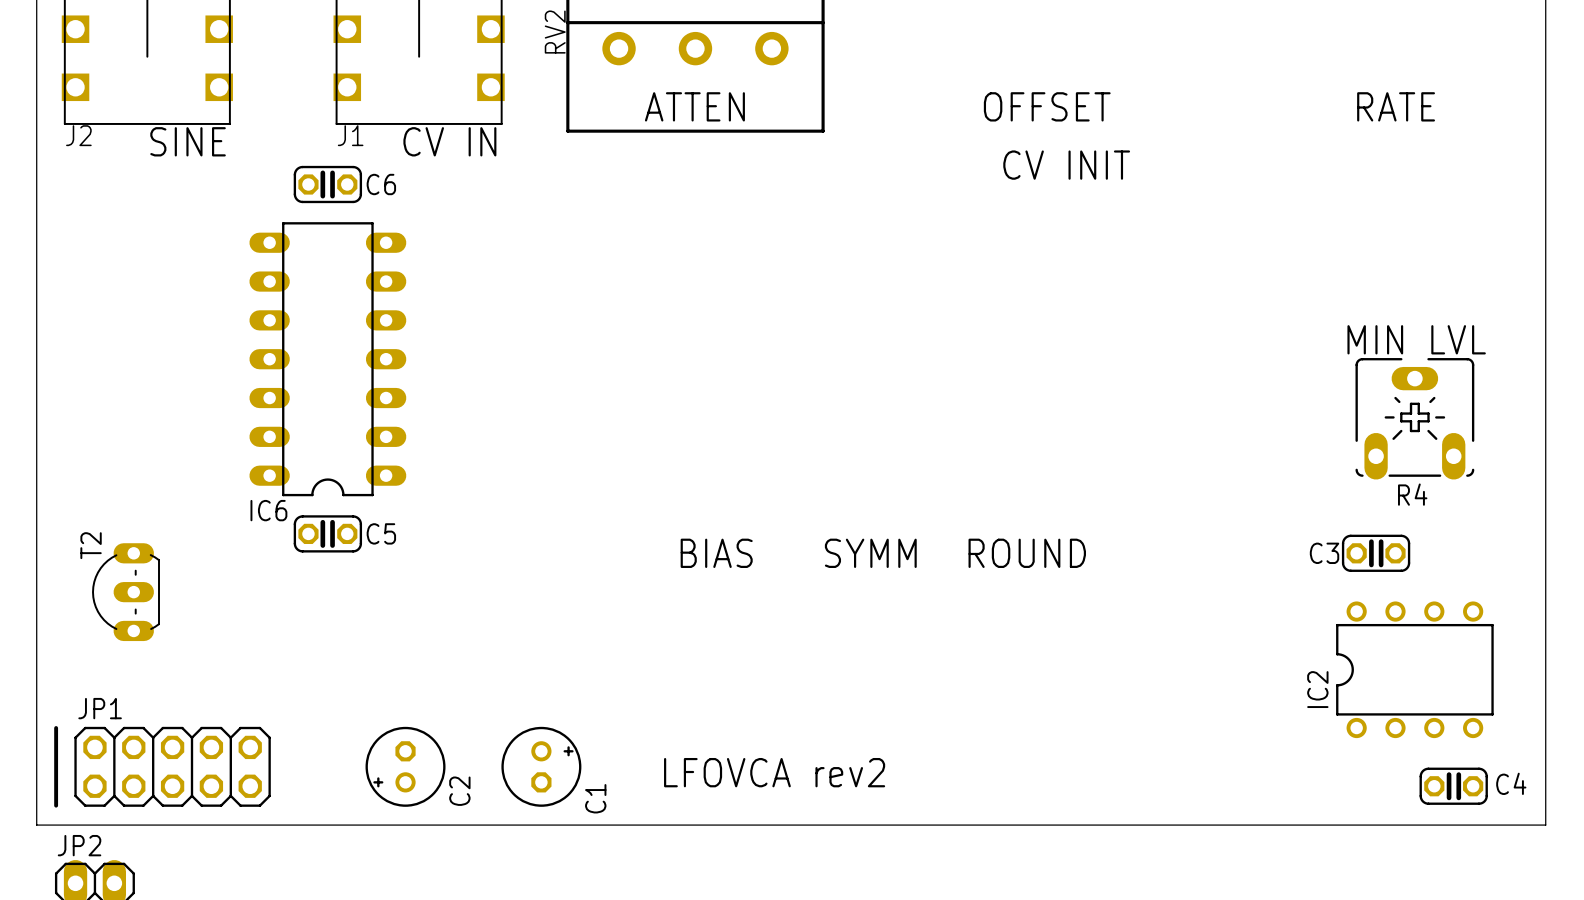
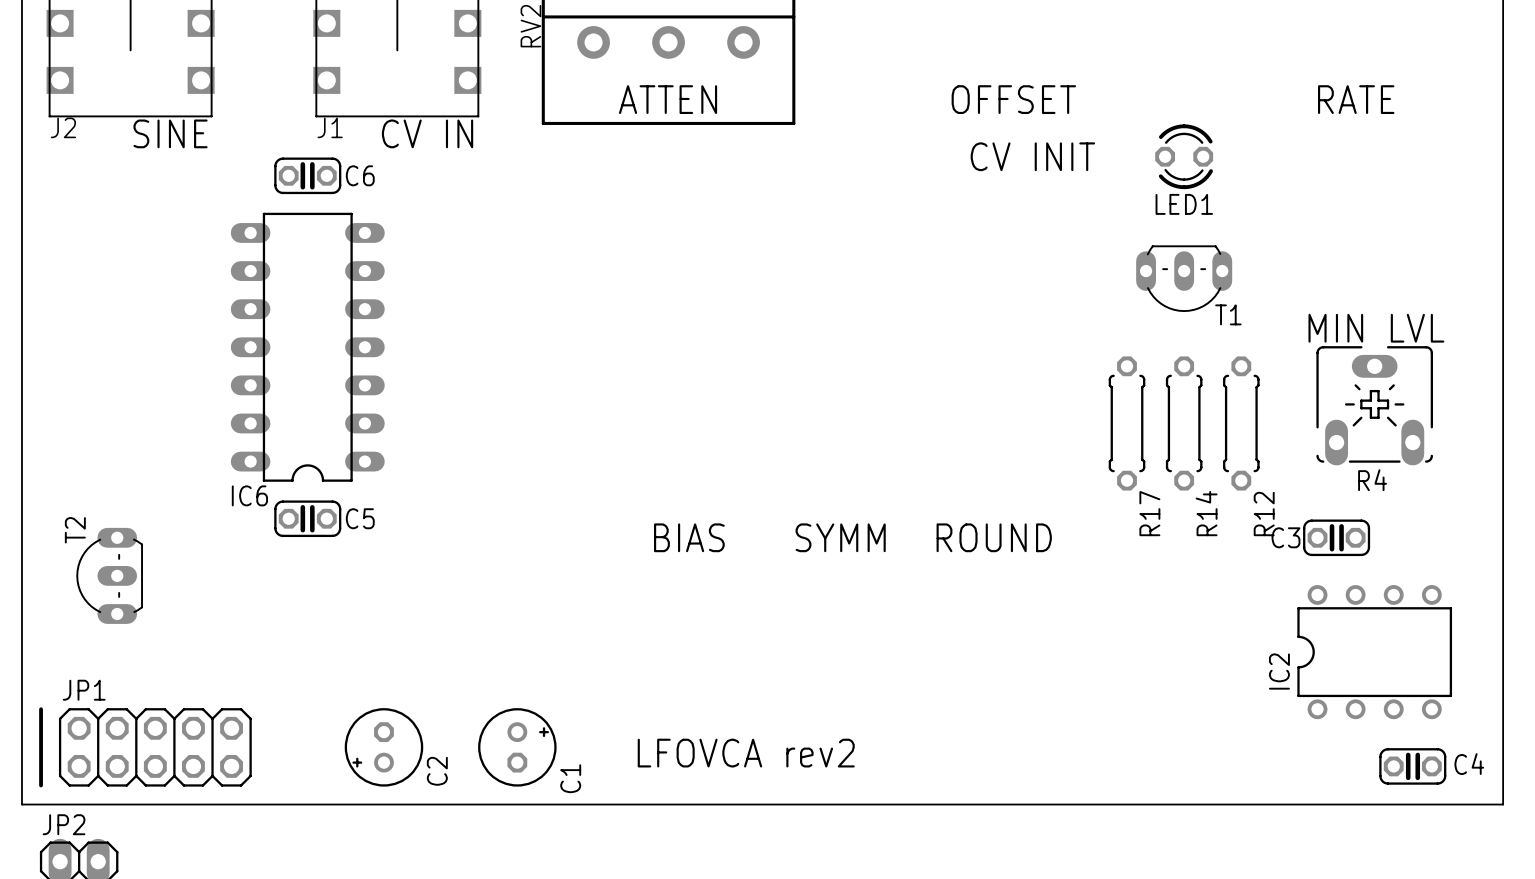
LED1: none -> (1184, 156)
T1: none -> (1184, 278)
R17: none -> (1127, 423)
R14: none -> (1184, 423)
R12: none -> (1241, 423)

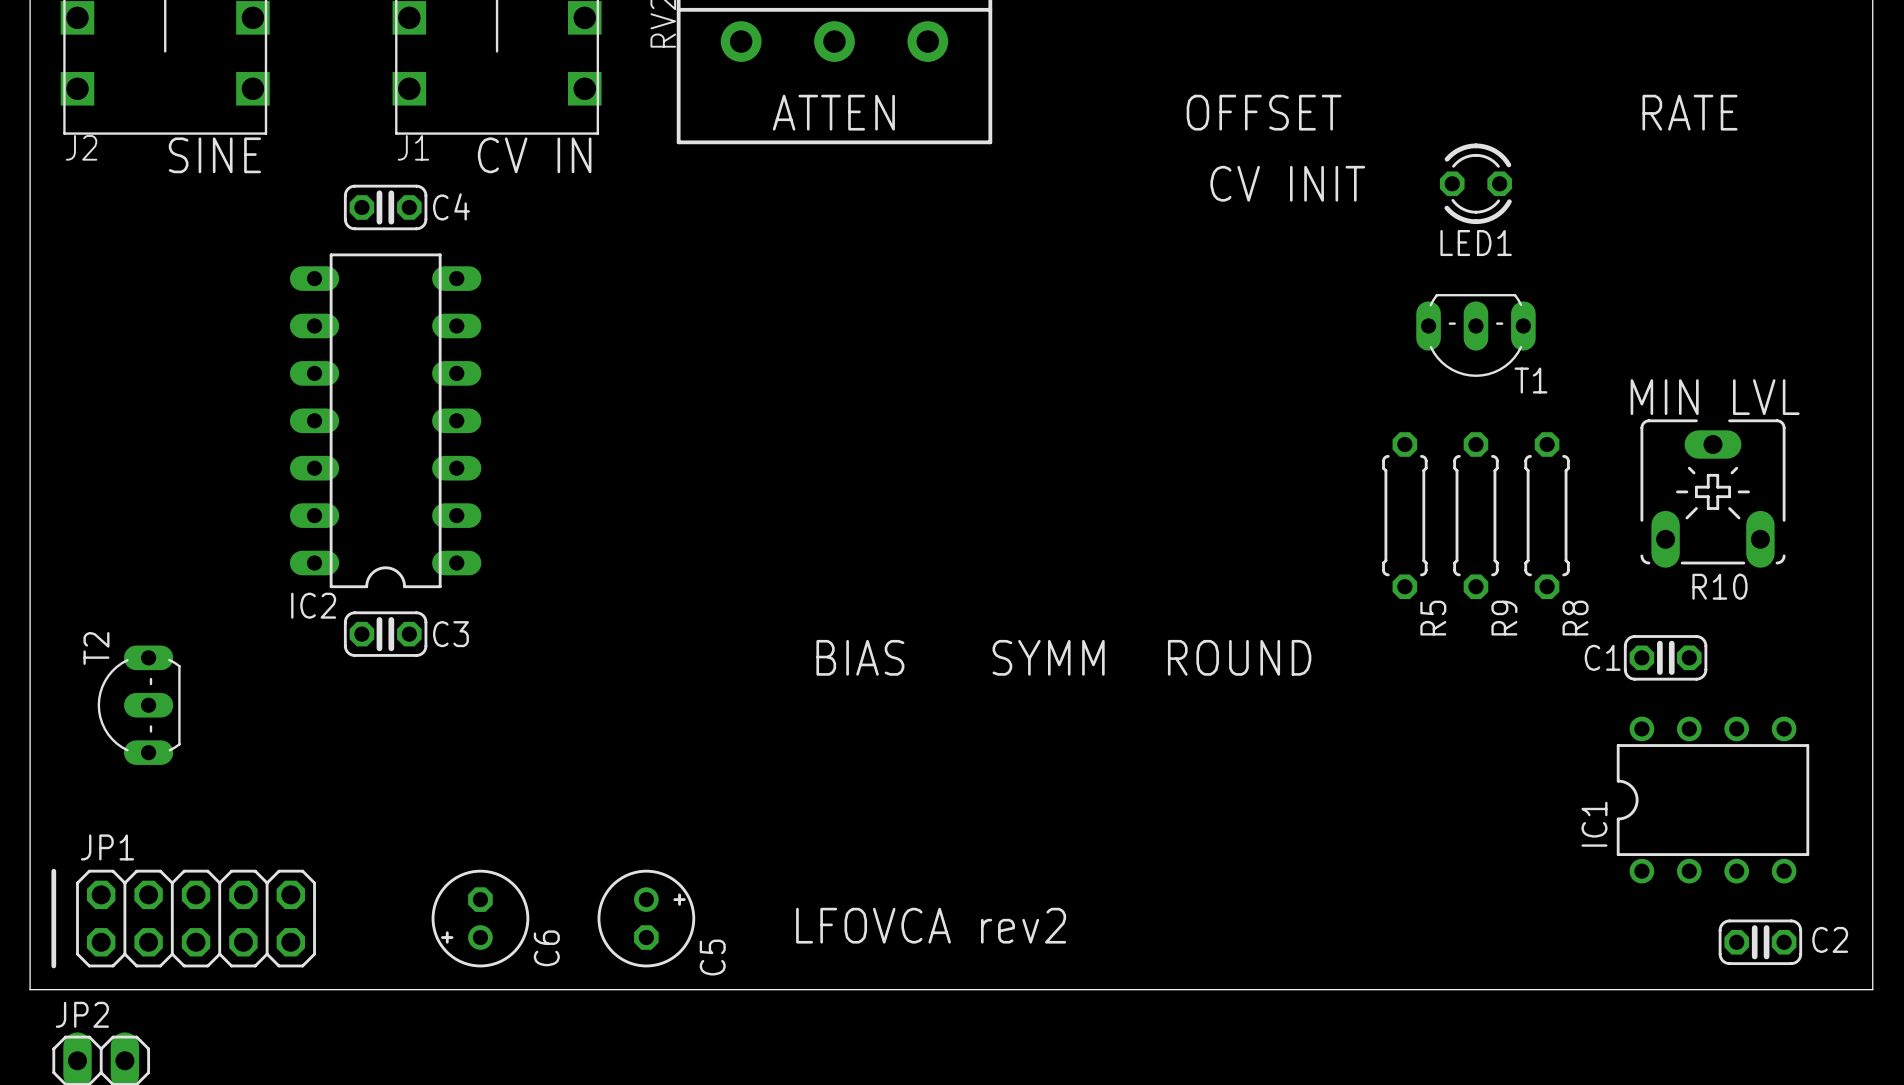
C6 name: C6 (360, 175) -> C4 (451, 206)
R4 name: R4 (1372, 480) -> R10 (1719, 586)
IC6 name: IC6 (249, 495) -> IC2 (313, 605)
R17 name: R17 (1149, 513) -> R5 (1433, 618)
R14 name: R14 (1206, 513) -> R9 (1504, 618)
R12 name: R12 (1264, 514) -> R8 (1575, 618)
C5 name: C5 (360, 518) -> C3 (450, 634)
C3 name: C3 (1285, 537) -> C1 (1602, 657)
IC2 name: IC2 (1279, 671) -> IC1 (1594, 824)
C4 name: C4 (1469, 764) -> C2 (1830, 939)
C2 name: C2 (437, 771) -> C6 (546, 948)
C1 name: C1 (570, 778) -> C5 (712, 957)

